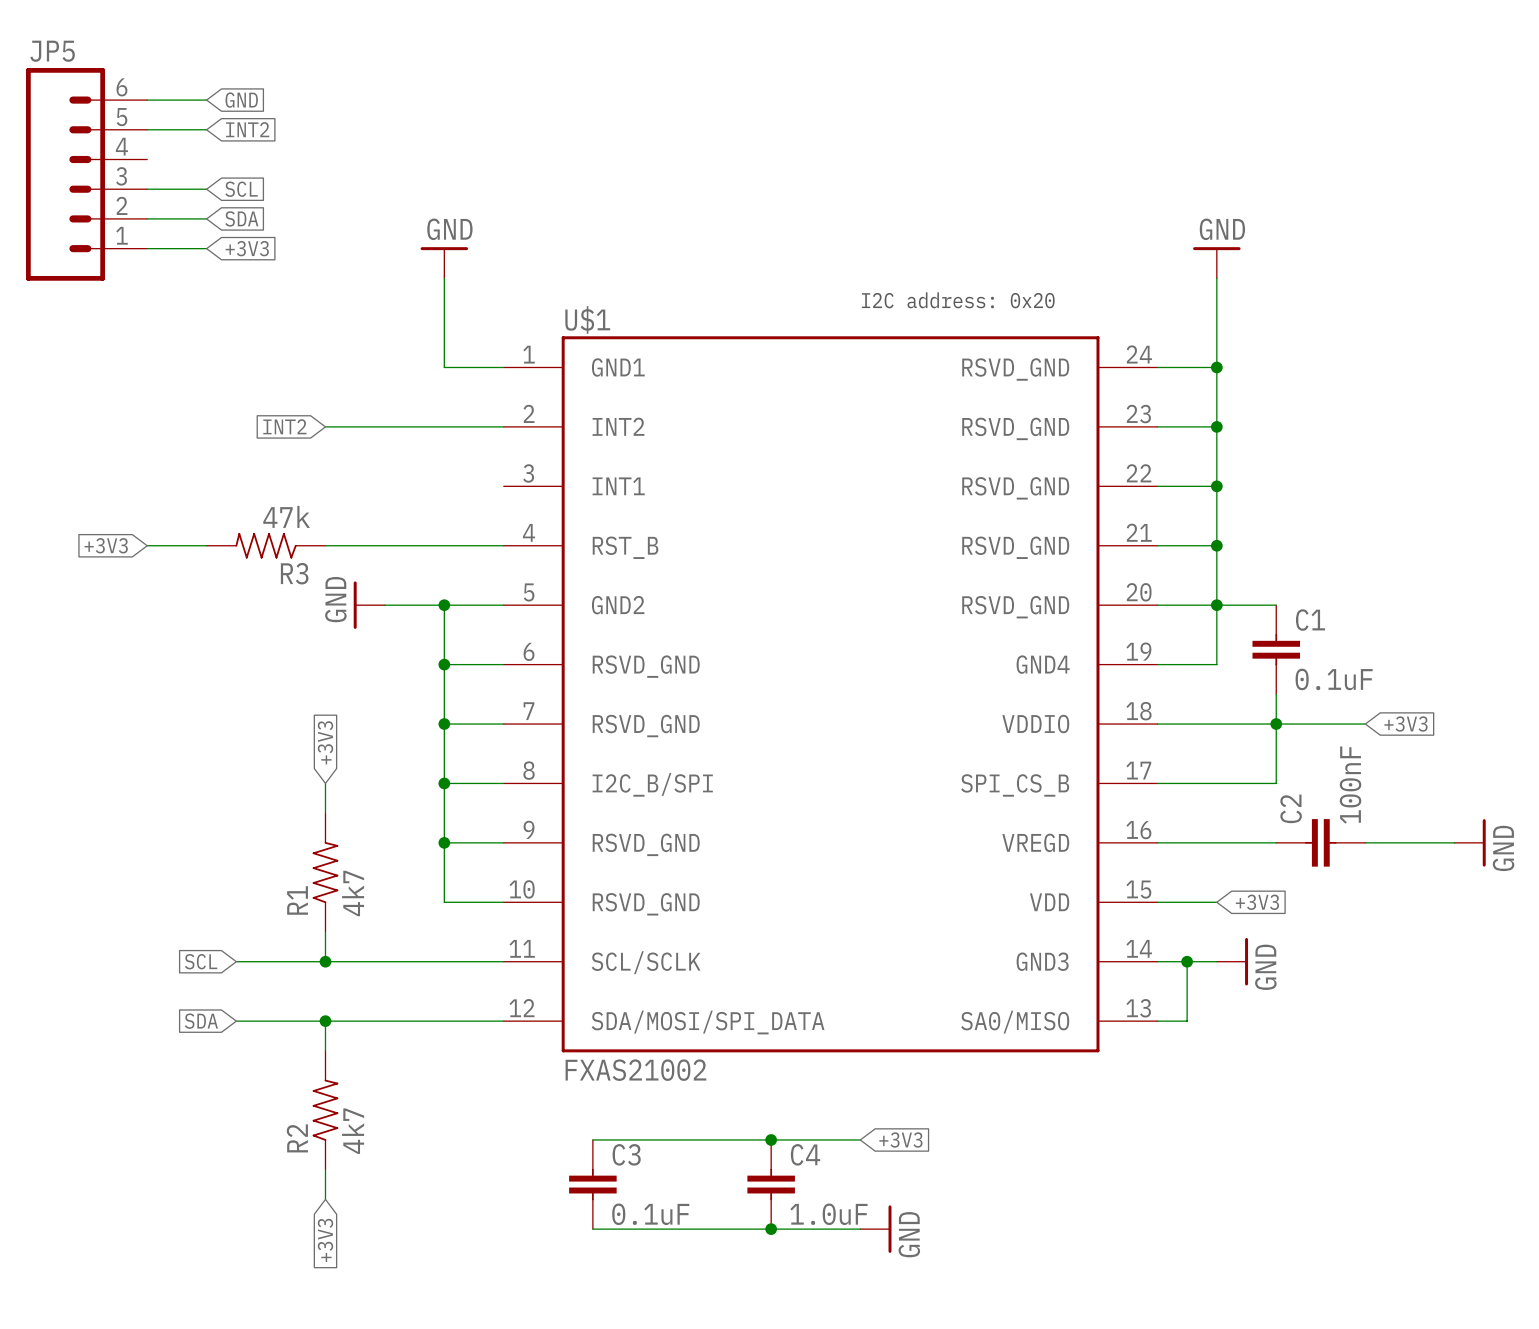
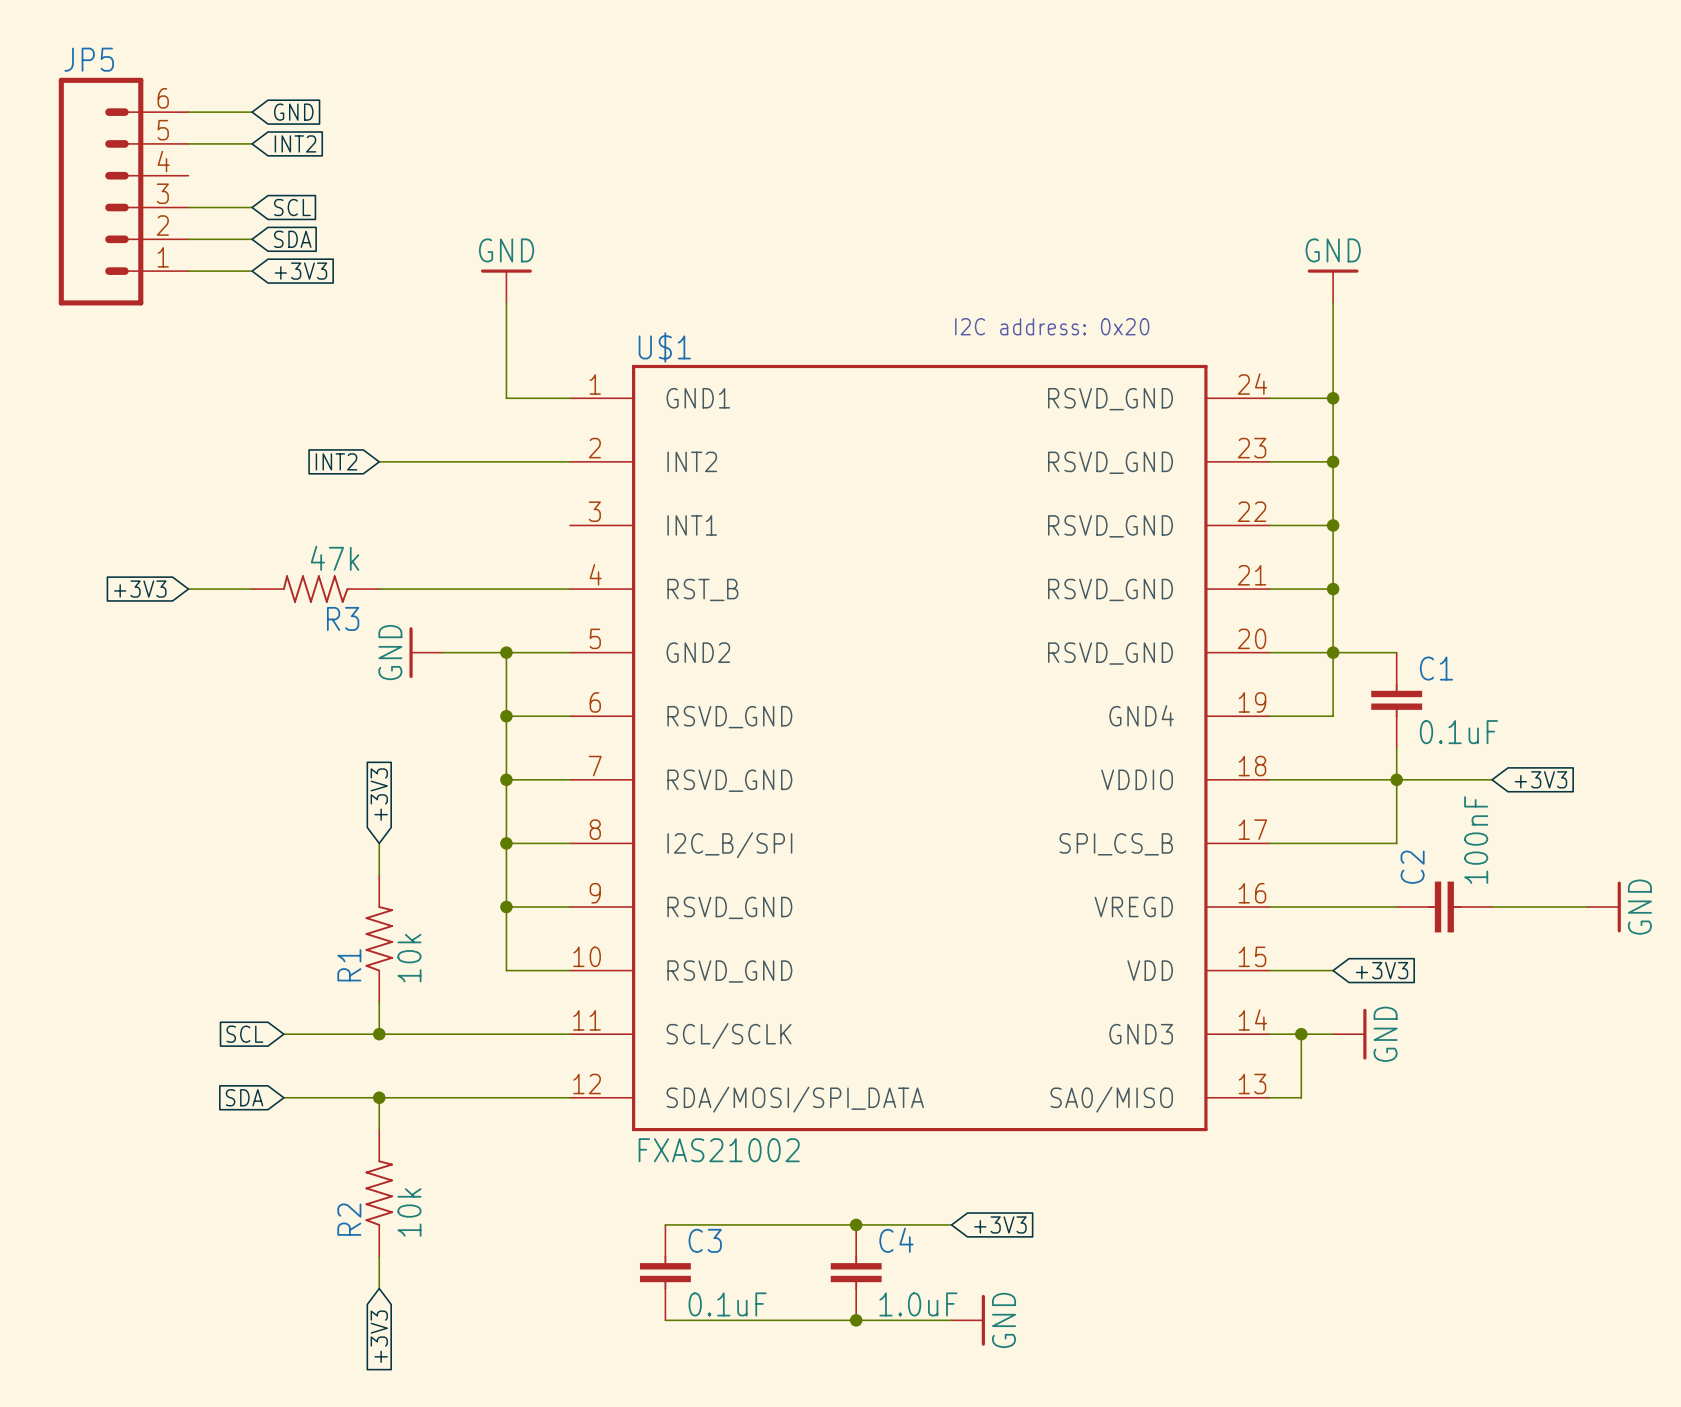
R1 value: 4k7 (353, 893) -> 10k (409, 958)
R2 value: 4k7 (353, 1131) -> 10k (409, 1212)

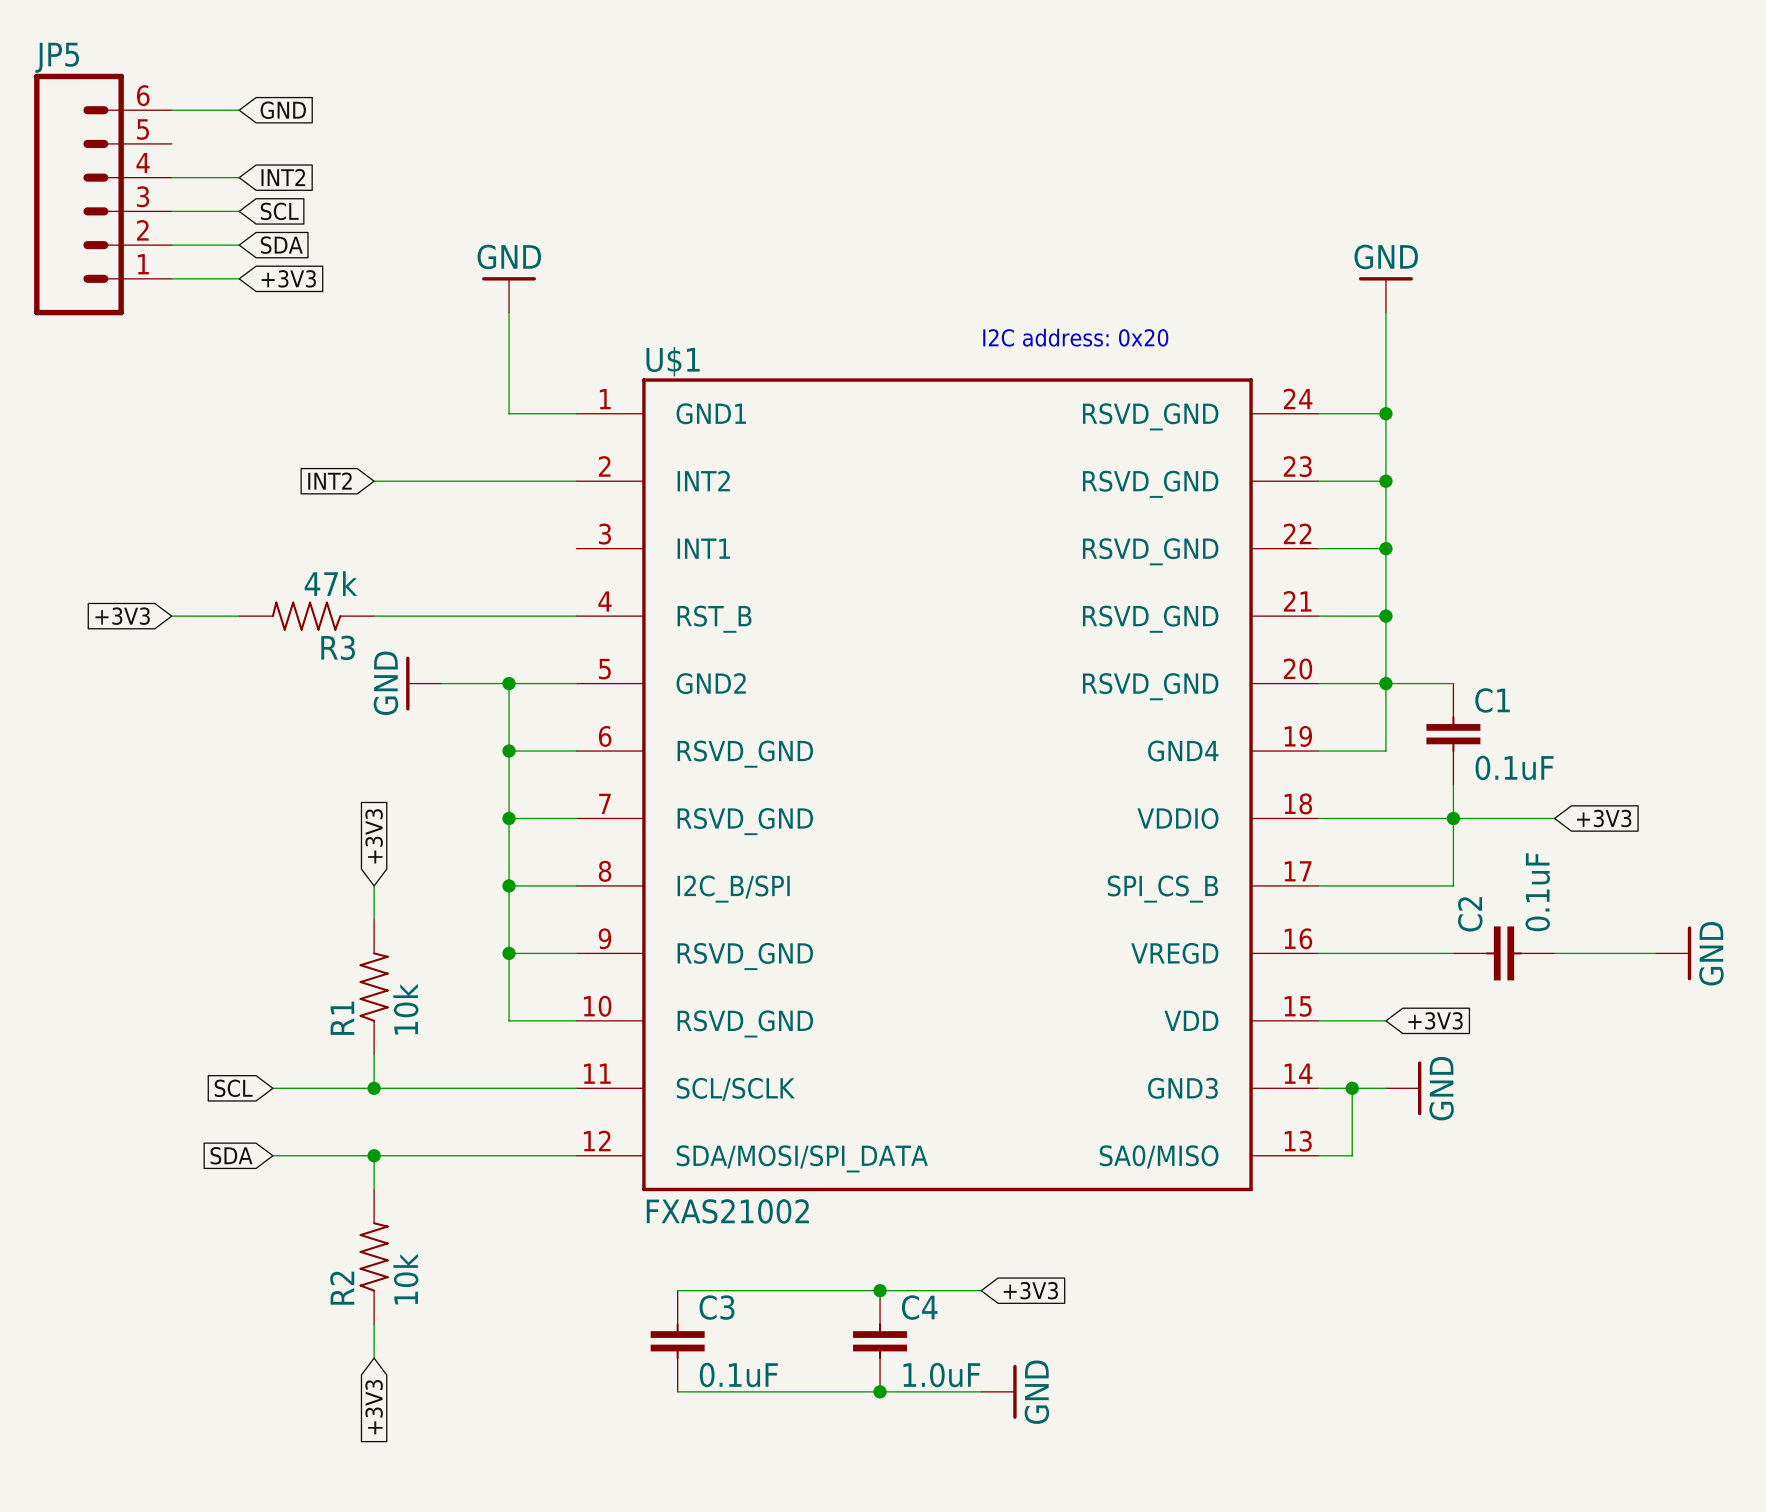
wire: (188, 143) (252, 143) -> (171, 177) (239, 177)
global label position: INT2 (295, 143) -> INT2 (283, 177)
C2 value: 100nF (1476, 840) -> 0.1uF (1537, 892)

